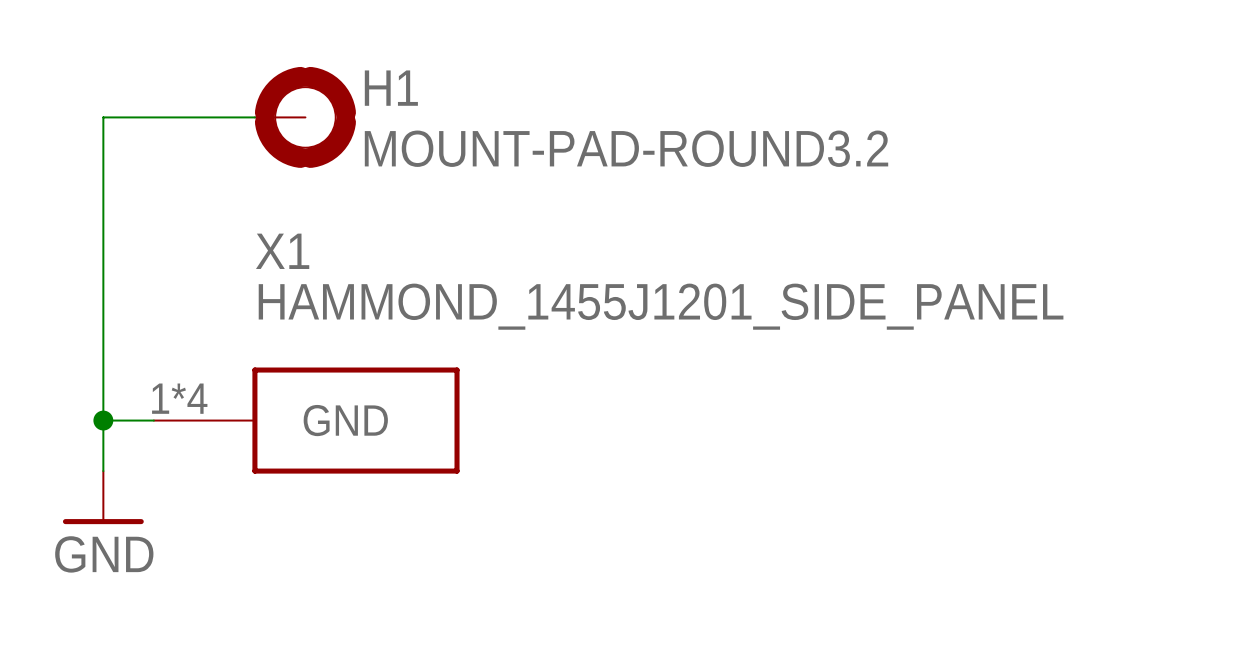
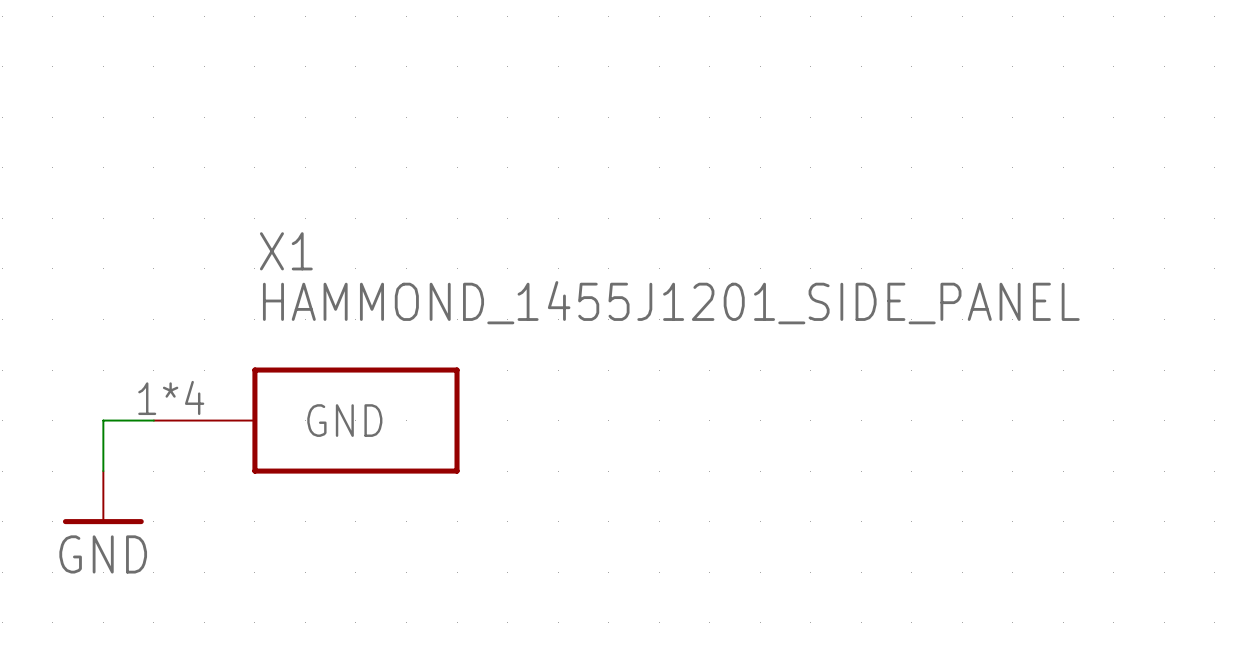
wire: (254, 117) (103, 117) (103, 420) -> none
H1: MOUNT-PAD-ROUND3.2 (305, 117) -> none
junction: (103, 420) -> none

